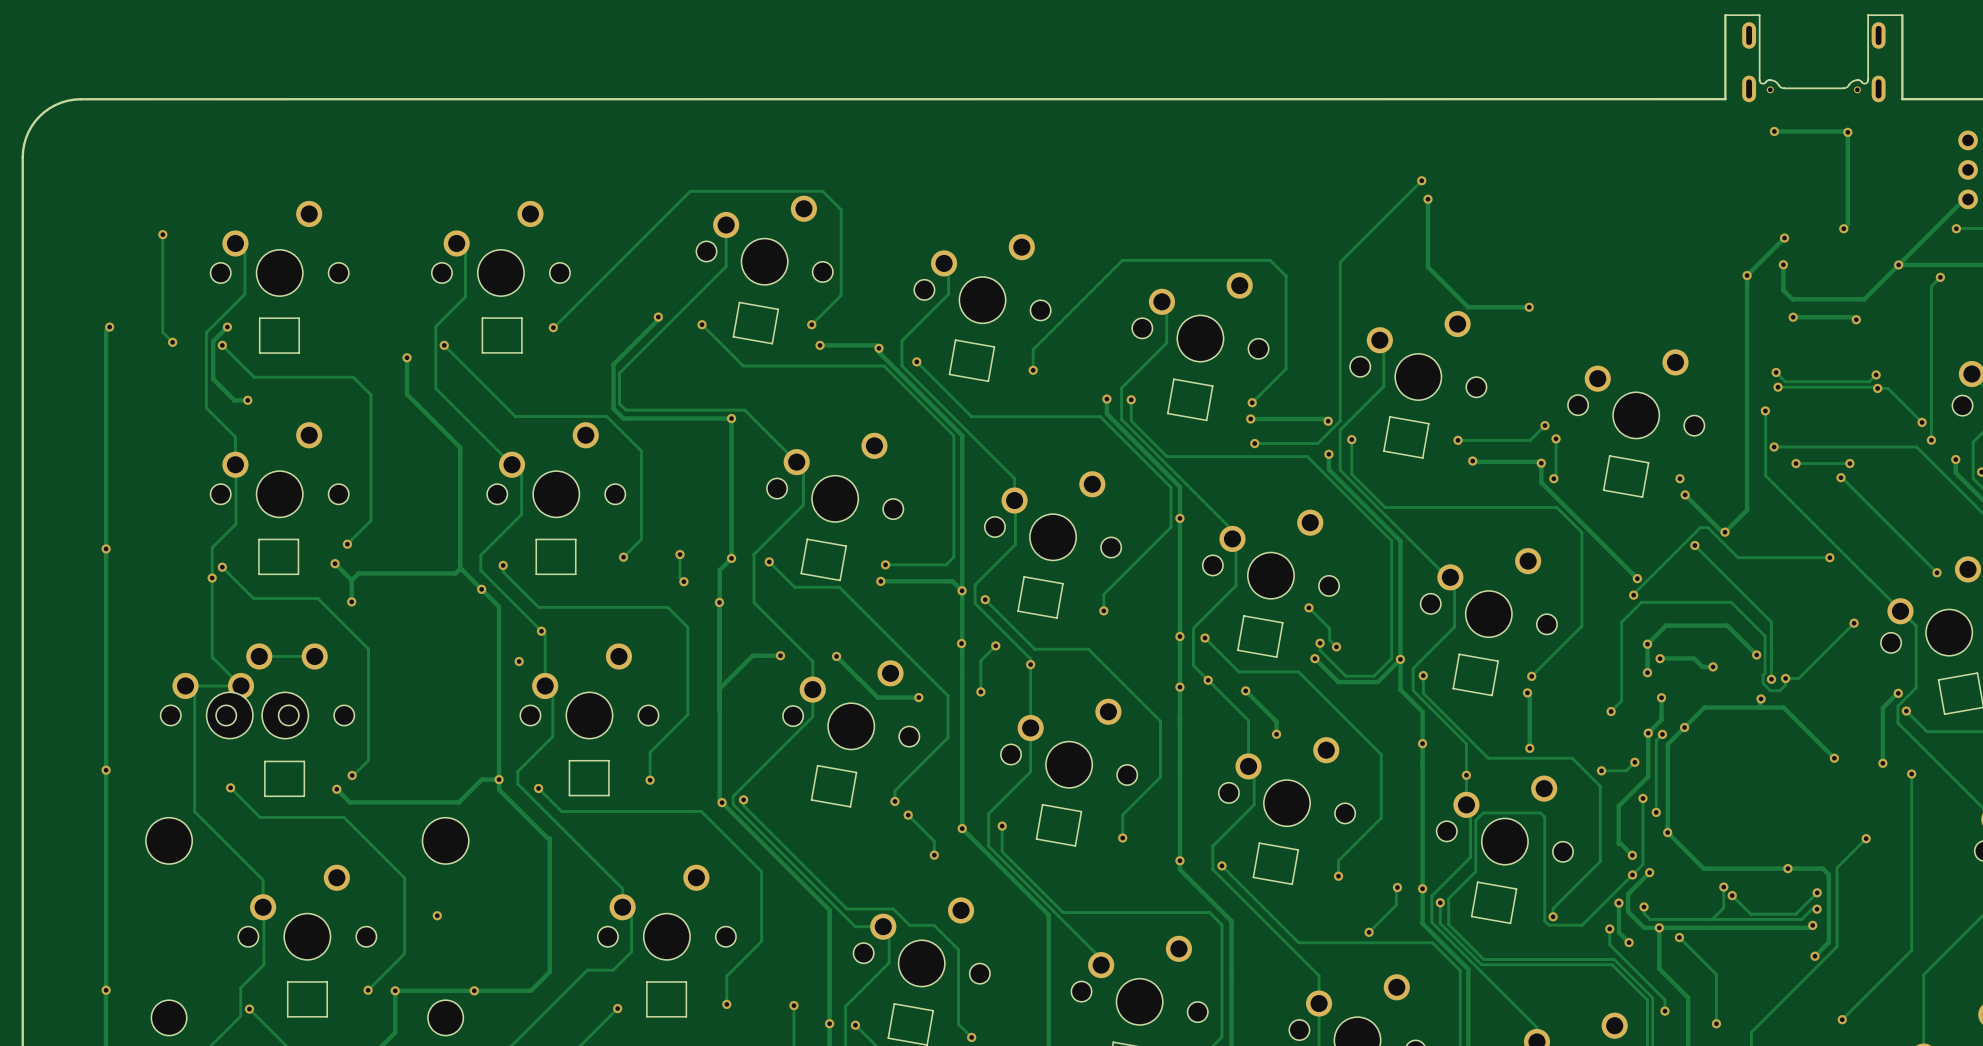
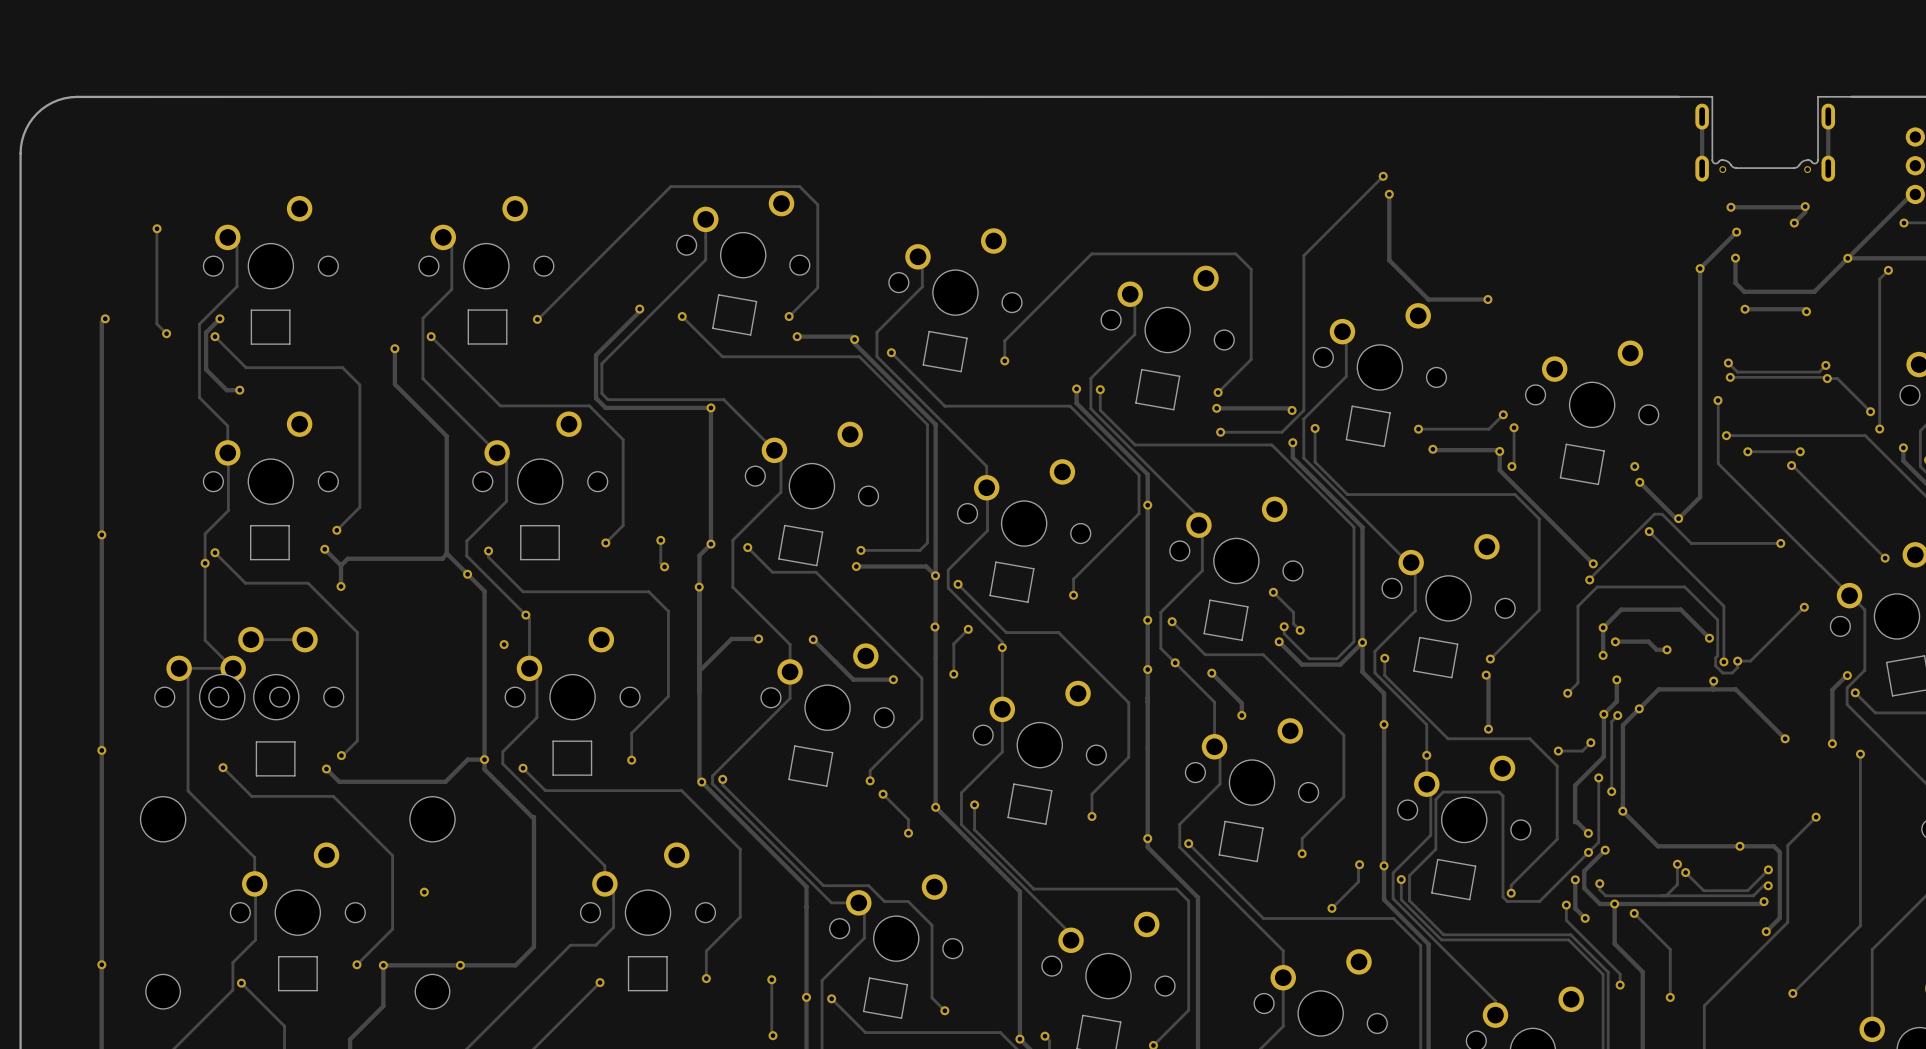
board edge: (1725, 15) (1725, 99) -> none
board edge: (1902, 15) (1902, 99) -> none
part position: (1813, 58) -> (1765, 138)
track: none -> (1702, 116) (1702, 168)
track: none -> (1828, 116) (1828, 168)
track: (1774, 131) (1847, 132) (1847, 224) -> (1730, 207) (1805, 206) (1805, 212) (1798, 219)
via: (1774, 131) -> none
via: (1847, 132) -> none
via: none -> (1805, 206)
via: none -> (1730, 207)

